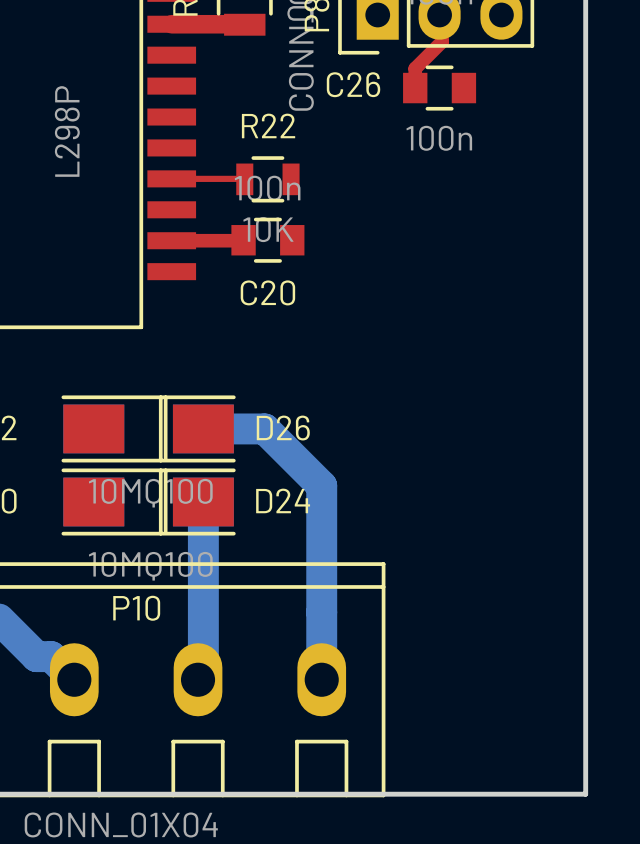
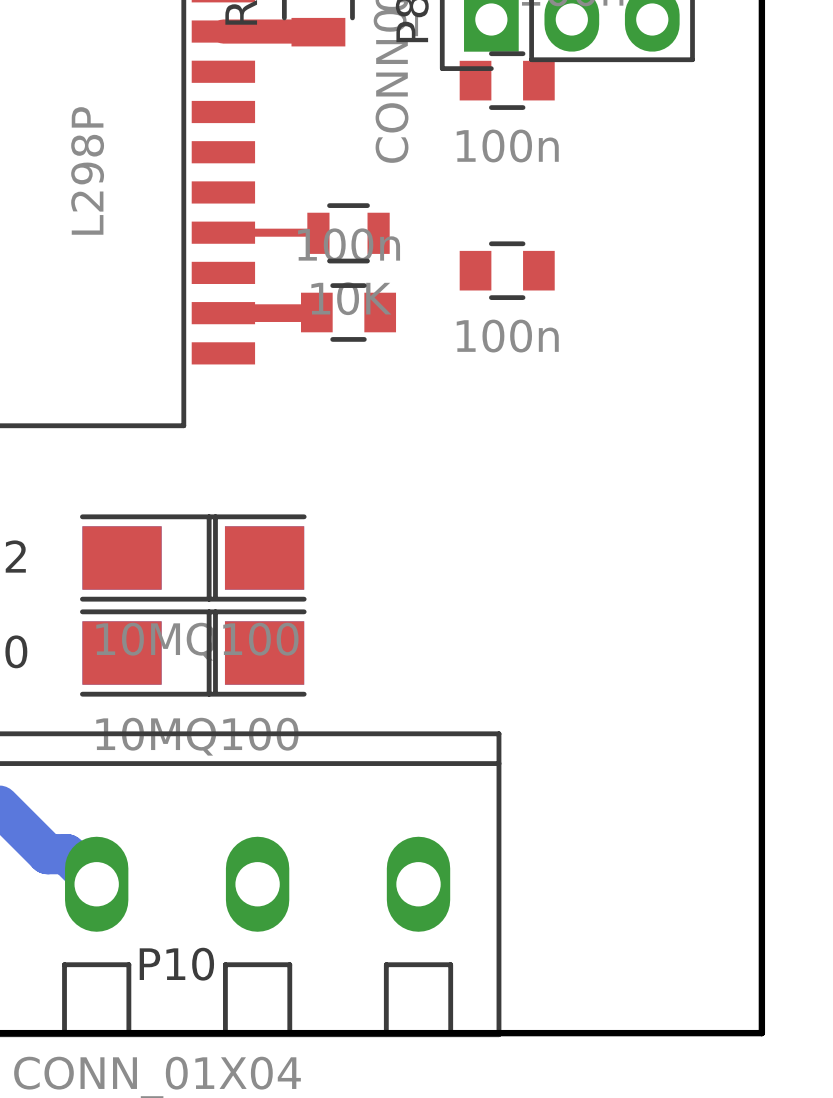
top track: (439, 14) (442, 17) (442, 41) (415, 68) (415, 88) -> none
part: none -> 100n (507, 80)
C26: 100n (439, 88) -> none
R22 name: R22 (268, 125) -> none
part: none -> 100n (507, 270)
C20 name: C20 (267, 292) -> none
bottom track: (203, 428) (264, 428) (321, 485) (321, 679) -> none
D26 name: D26 (283, 428) -> none
D24 name: D24 (283, 500) -> none
bottom track: (203, 502) (203, 674) (198, 679) -> none
P10 name position: P10 (136, 608) -> P10 (176, 964)

